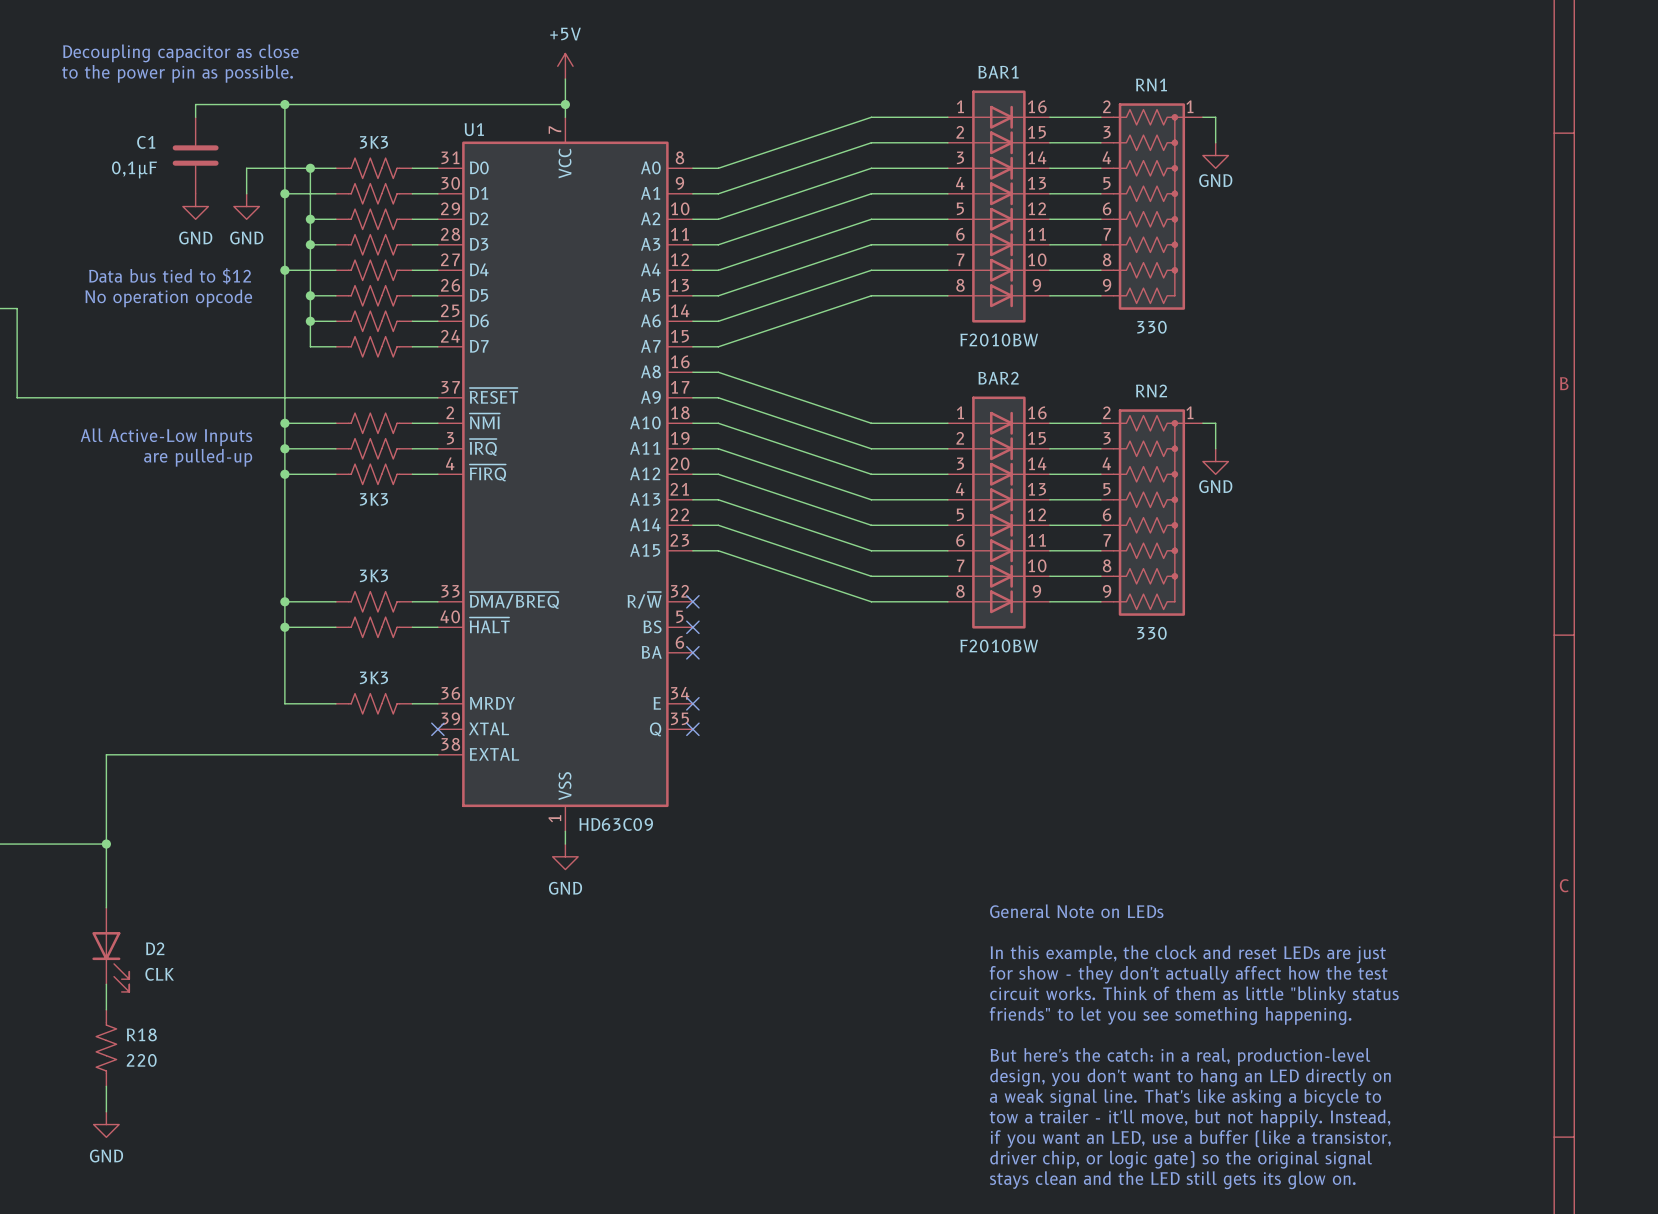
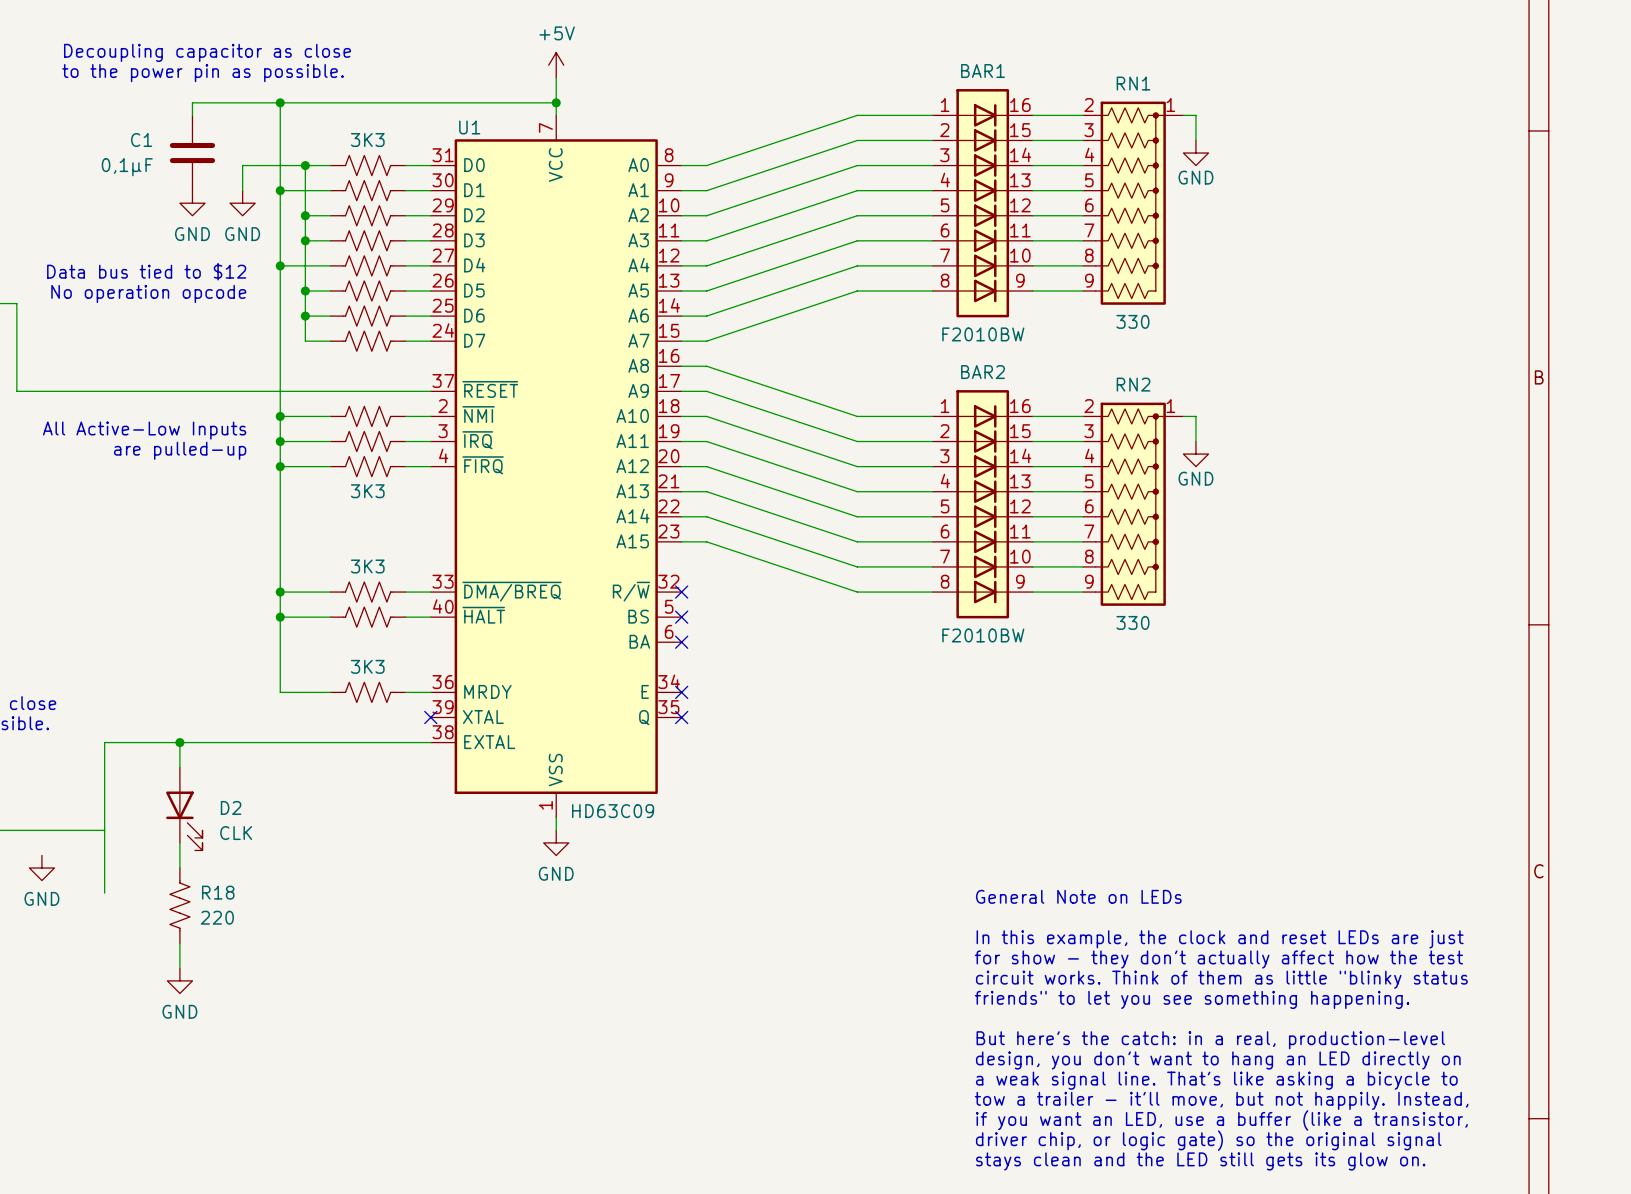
wire: none -> (179, 742) (179, 767)
junction: none -> (179, 742)
junction: (106, 844) -> none
power symbol: none -> GND (41, 868)
D2 position: (110, 949) -> (184, 809)
wire: (106, 984) (106, 1009) -> (179, 842) (179, 868)
power symbol: none -> GND (179, 980)
R18 position: (106, 1048) -> (179, 905)
wire: (106, 1086) (106, 1111) -> (179, 943) (179, 968)
power symbol: GND (106, 1124) -> none

